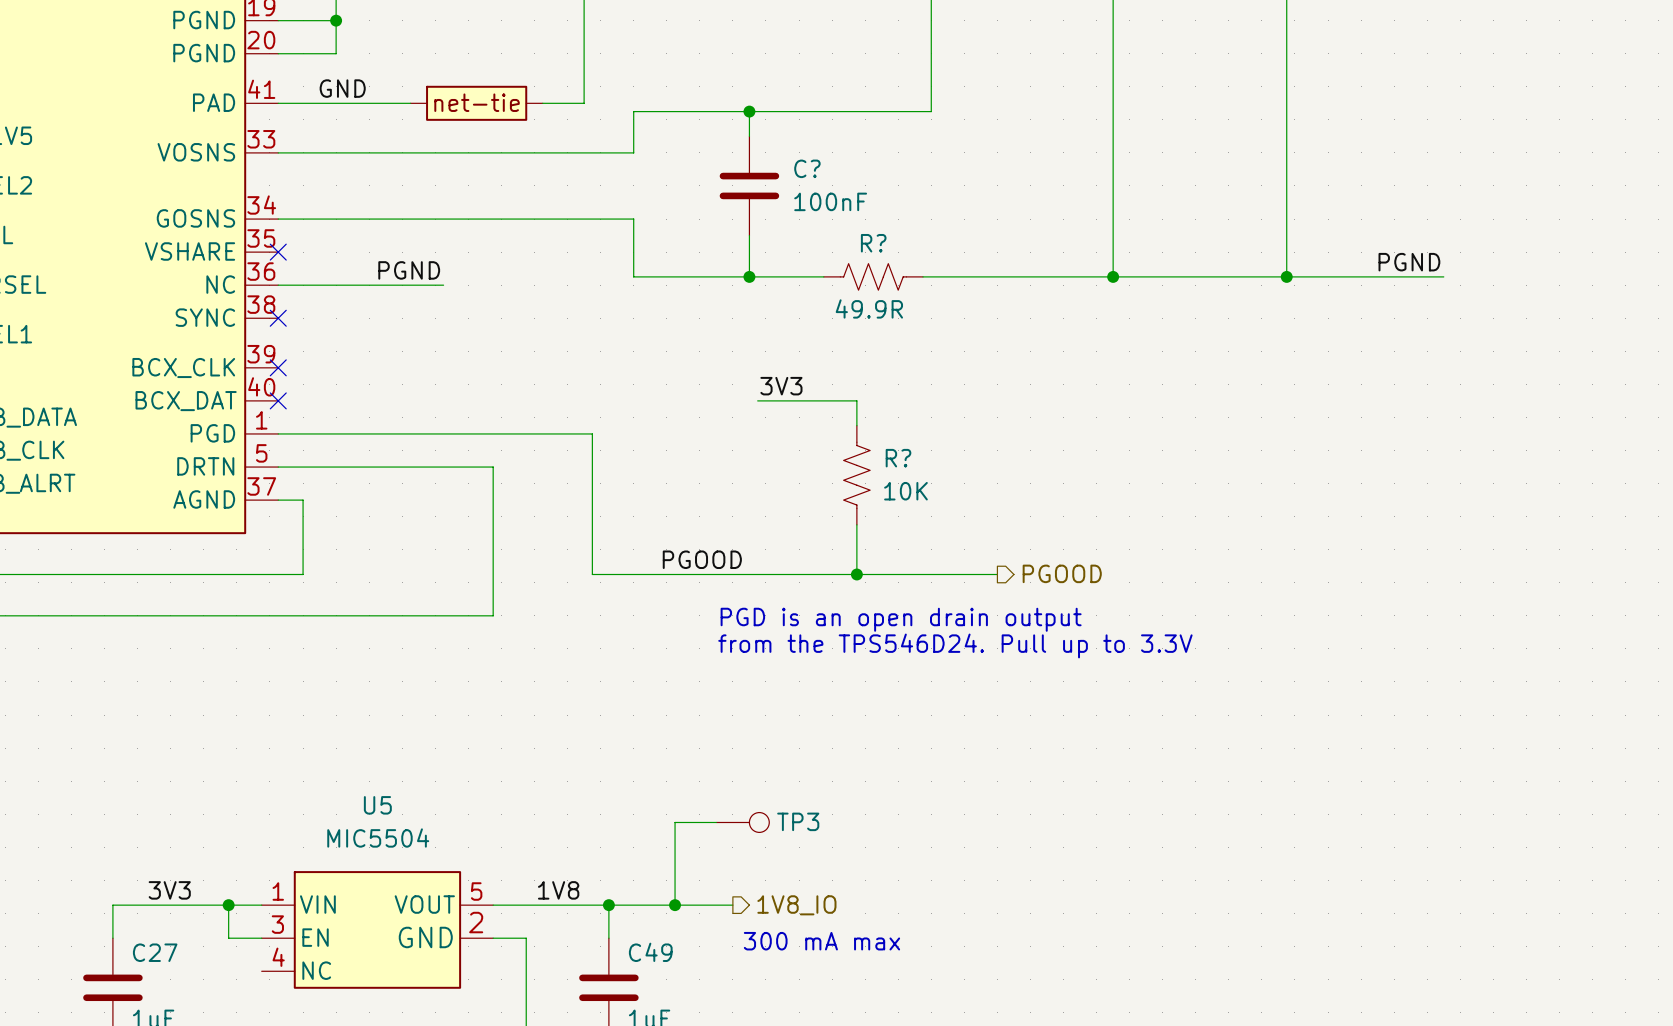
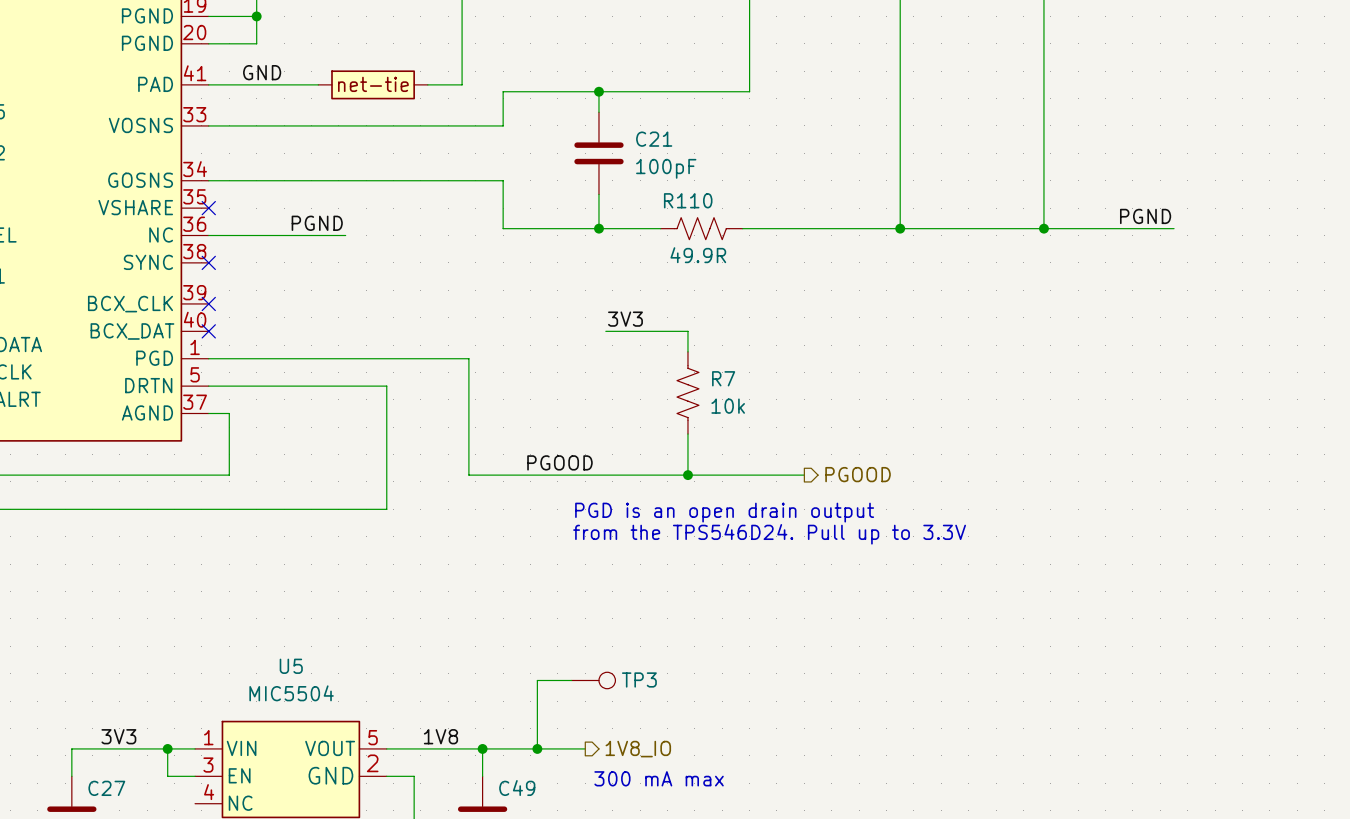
C? name: C? (807, 168) -> C21 (654, 139)
C? value: 100nF (830, 201) -> 100pF (666, 168)
R? name: R? (873, 243) -> R110 (688, 200)
R? name: R? (898, 458) -> R7 (723, 378)
R? value: 10K (905, 491) -> 10k (728, 406)

